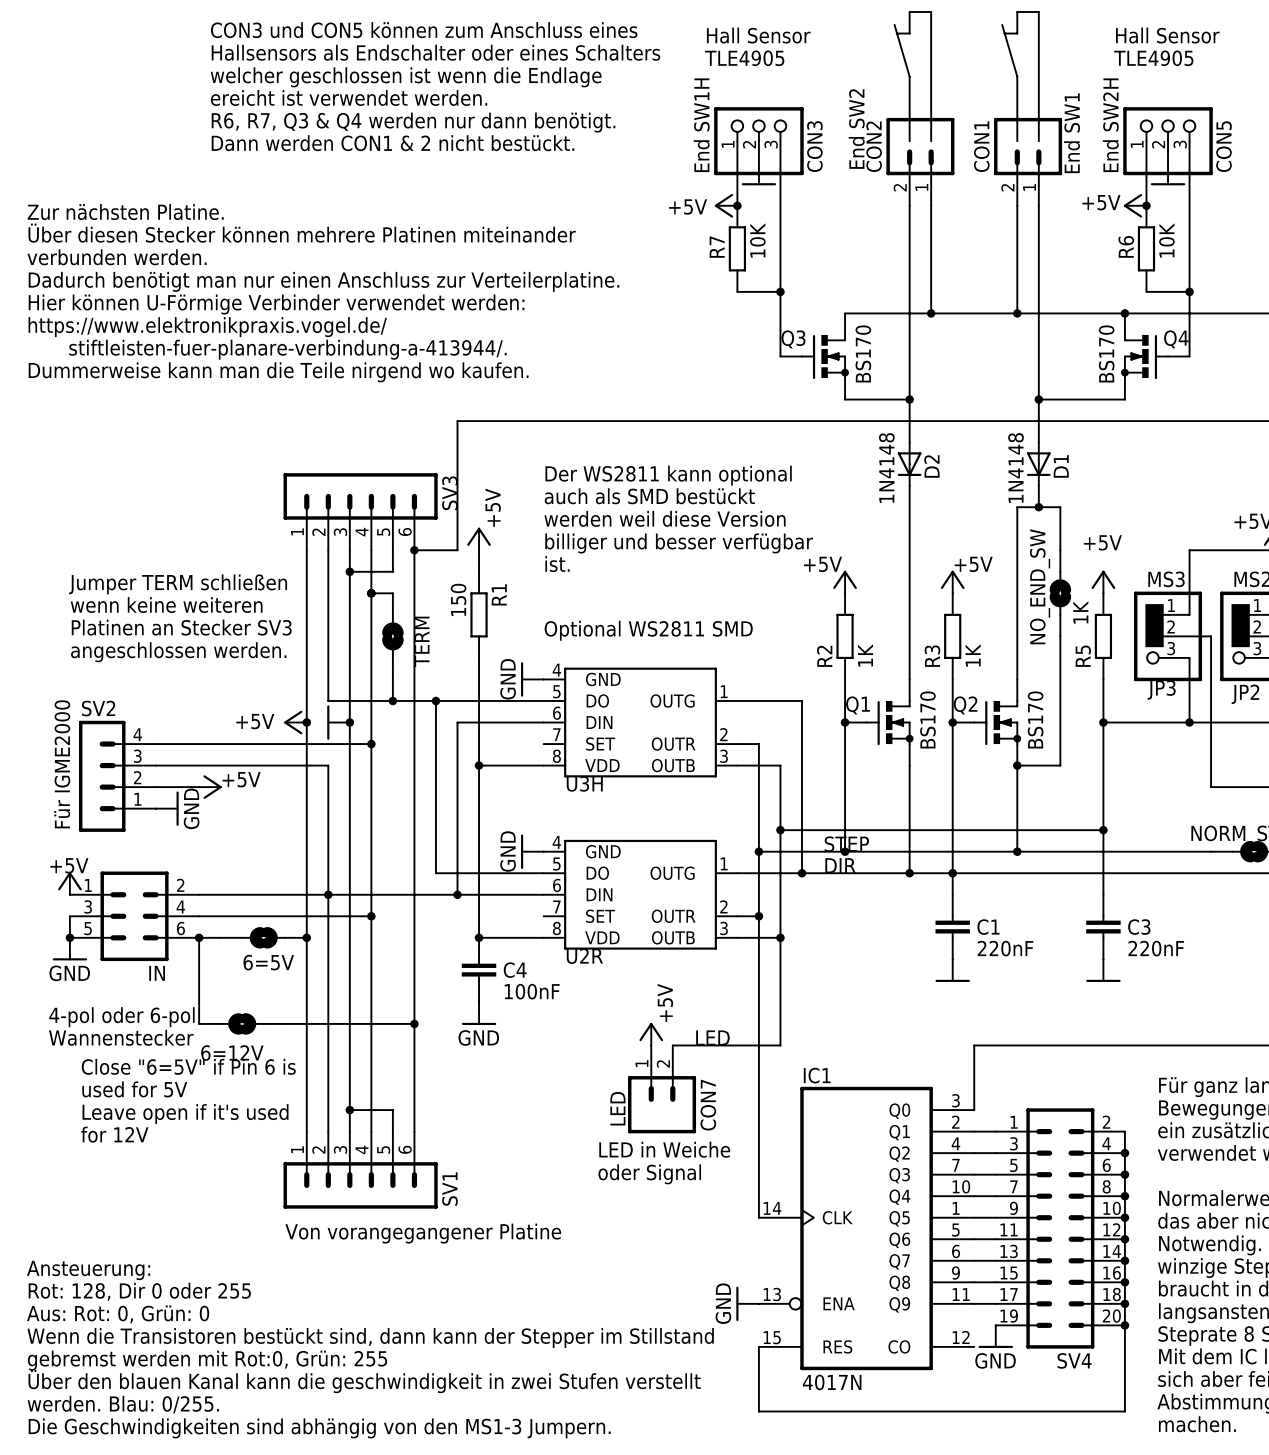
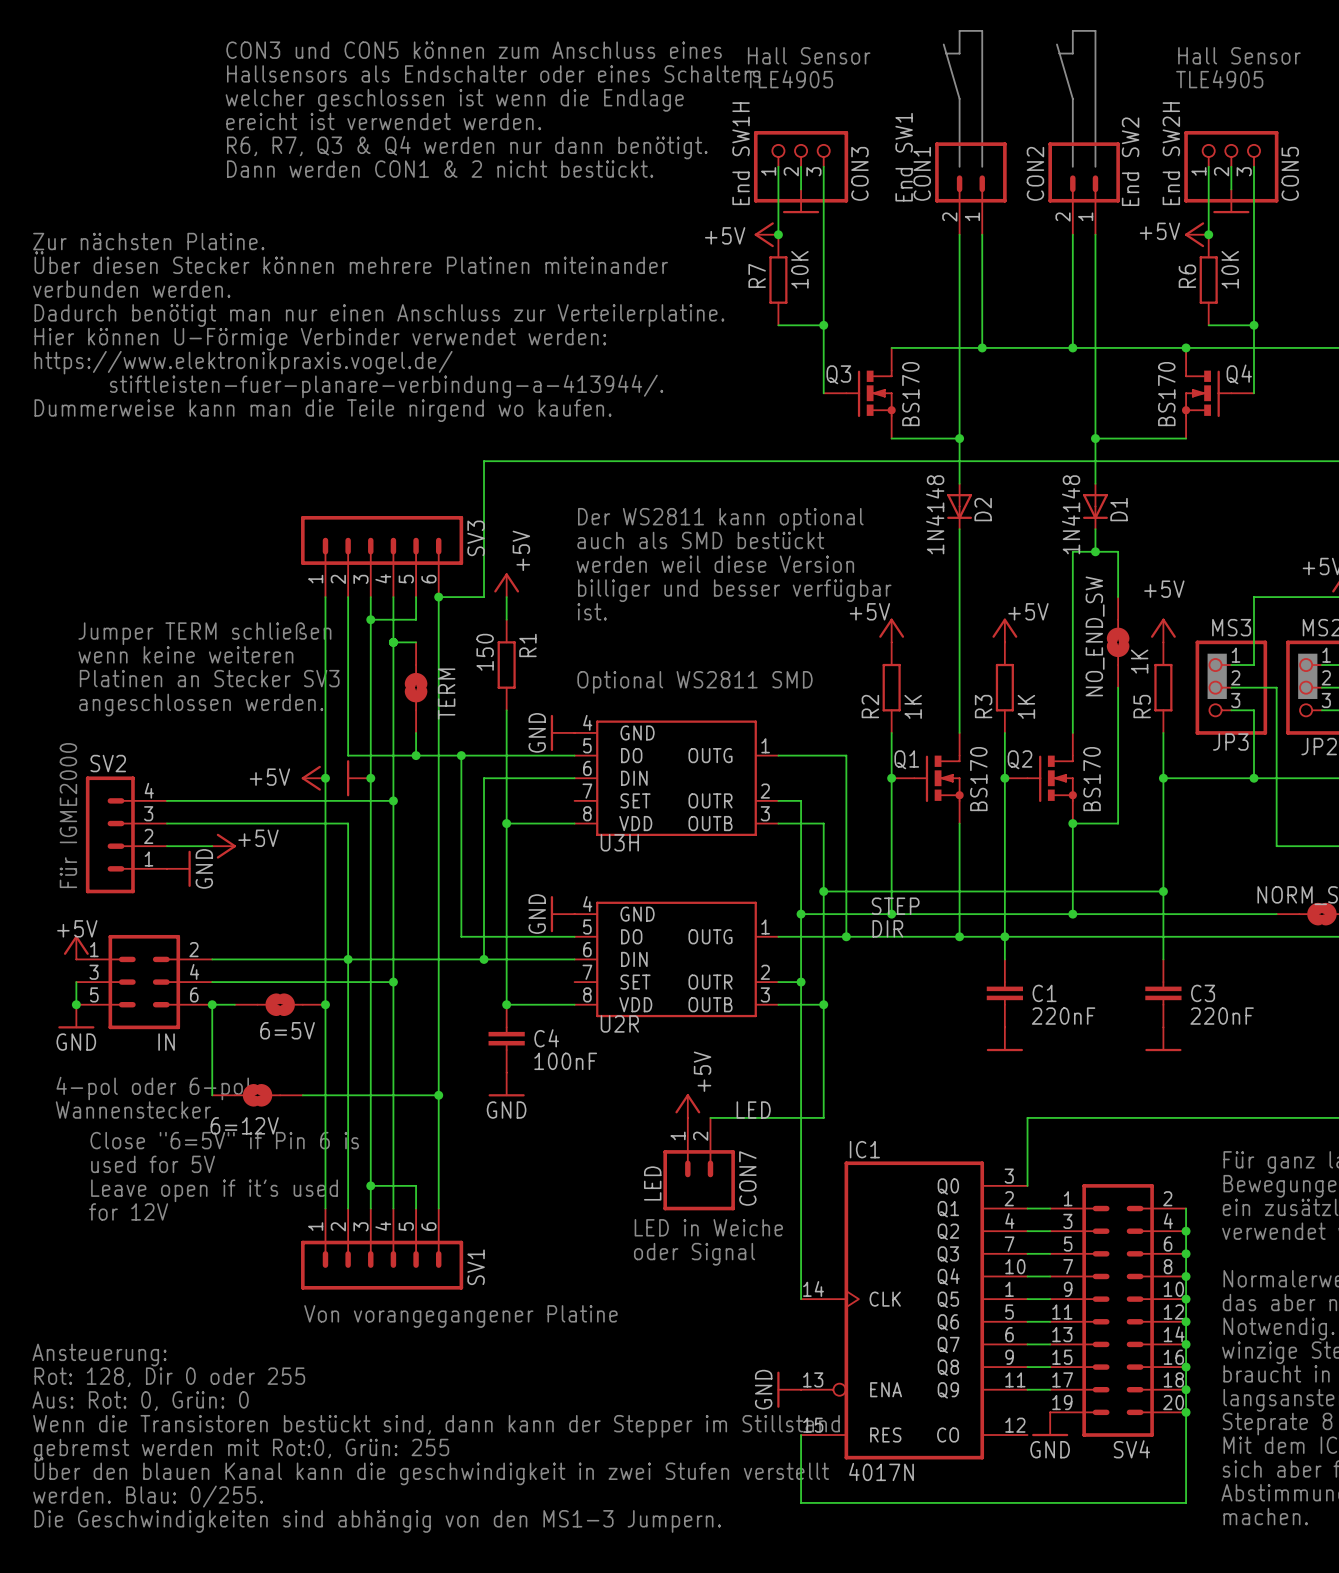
CON2 value: End SW2 (856, 129) -> End SW1 (904, 157)
CON1 value: End SW1 (1072, 133) -> End SW2 (1130, 161)
CON2 name: CON2 (874, 146) -> CON1 (922, 173)
CON1 name: CON1 (981, 146) -> CON2 (1035, 173)

